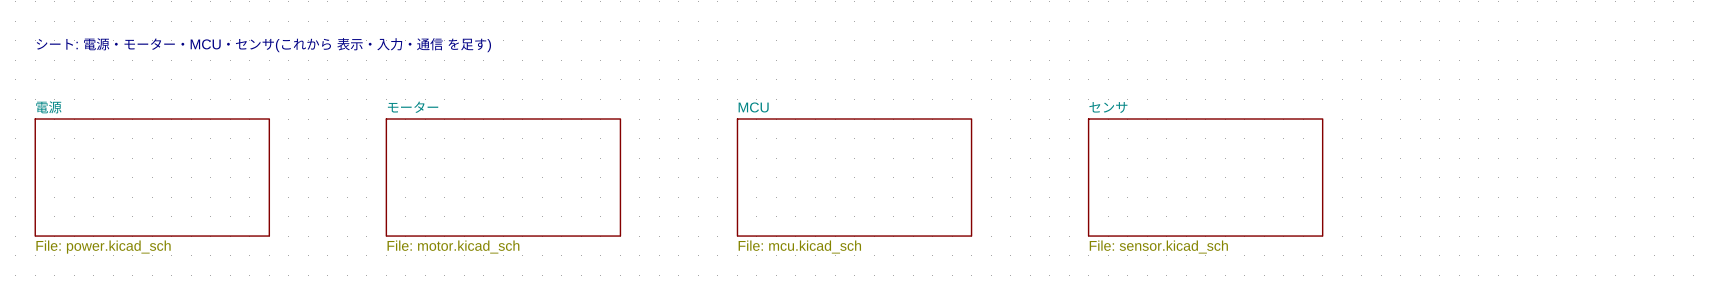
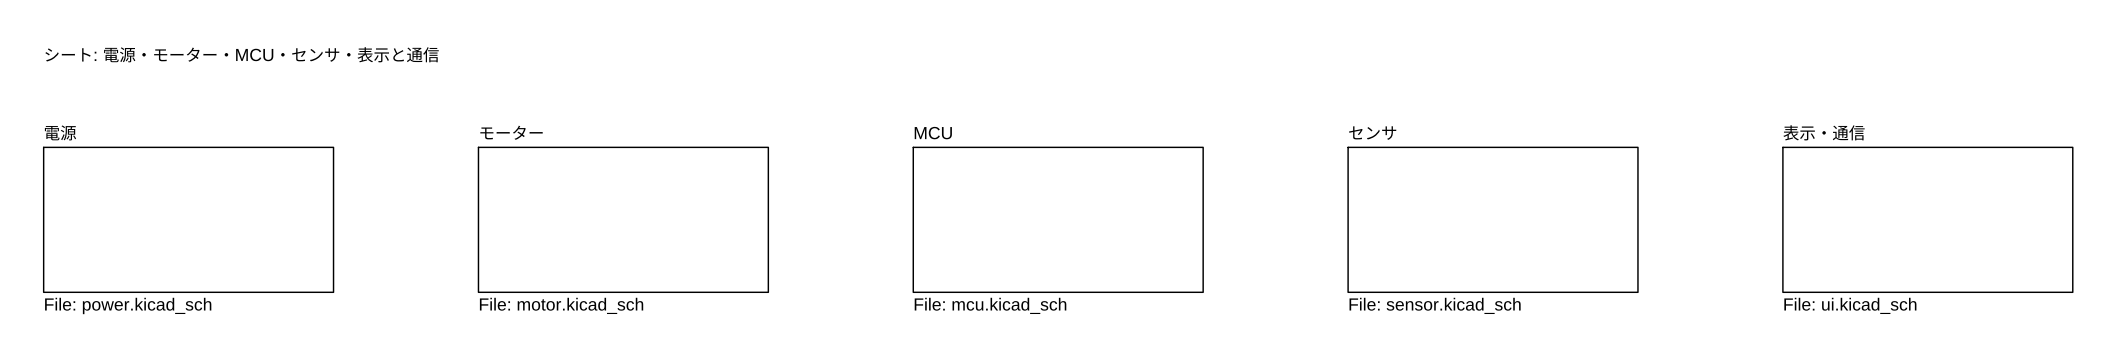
text: シート: 電源・モーター・MCU・センサ(これから 表示・入力・通信 を足す) (263, 45) -> シート: 電源・モーター・MCU・センサ・表示と通信 (242, 54)
sheet 表示・通信: none -> File: ui.kicad_sch (1927, 219)

